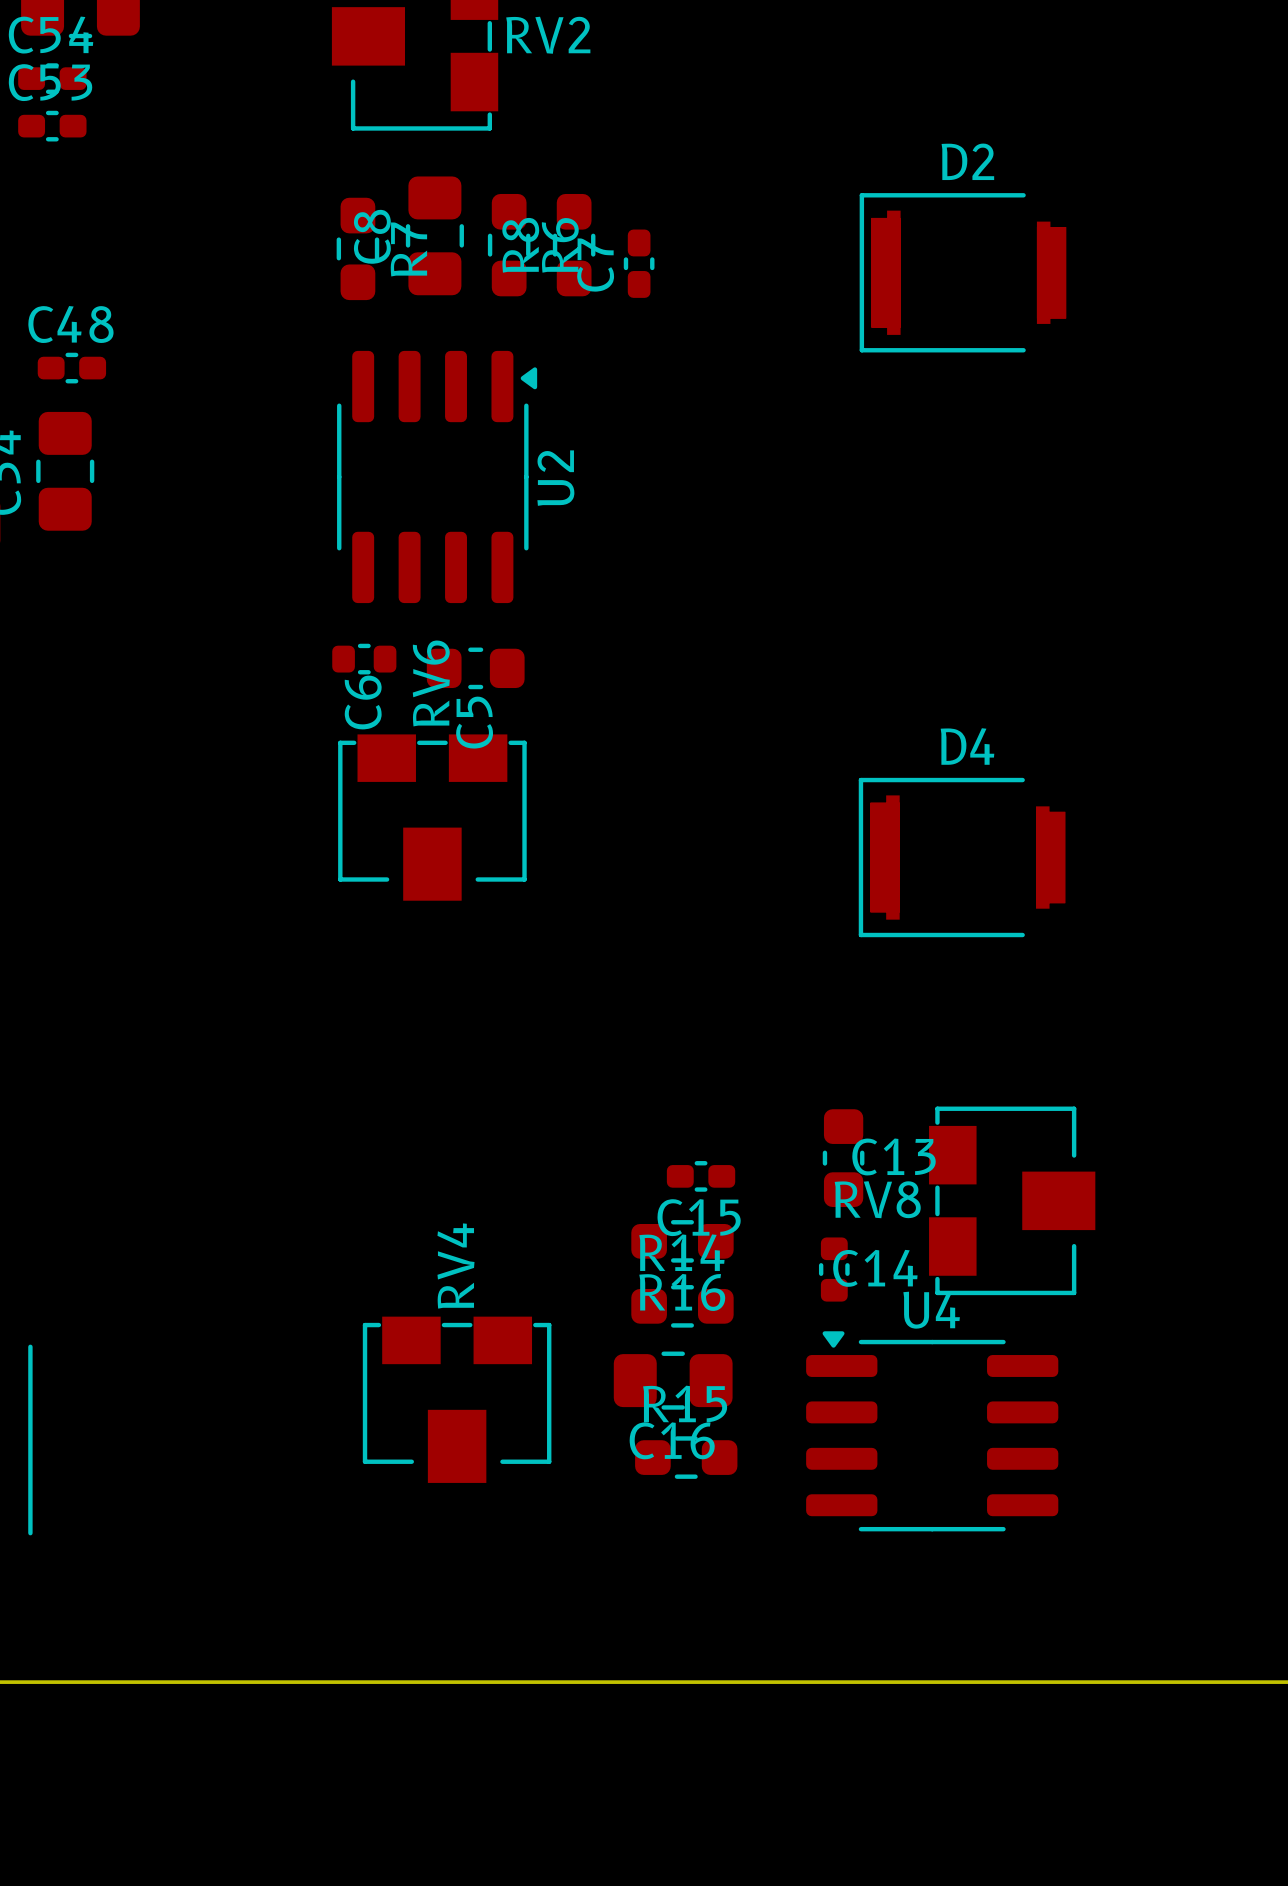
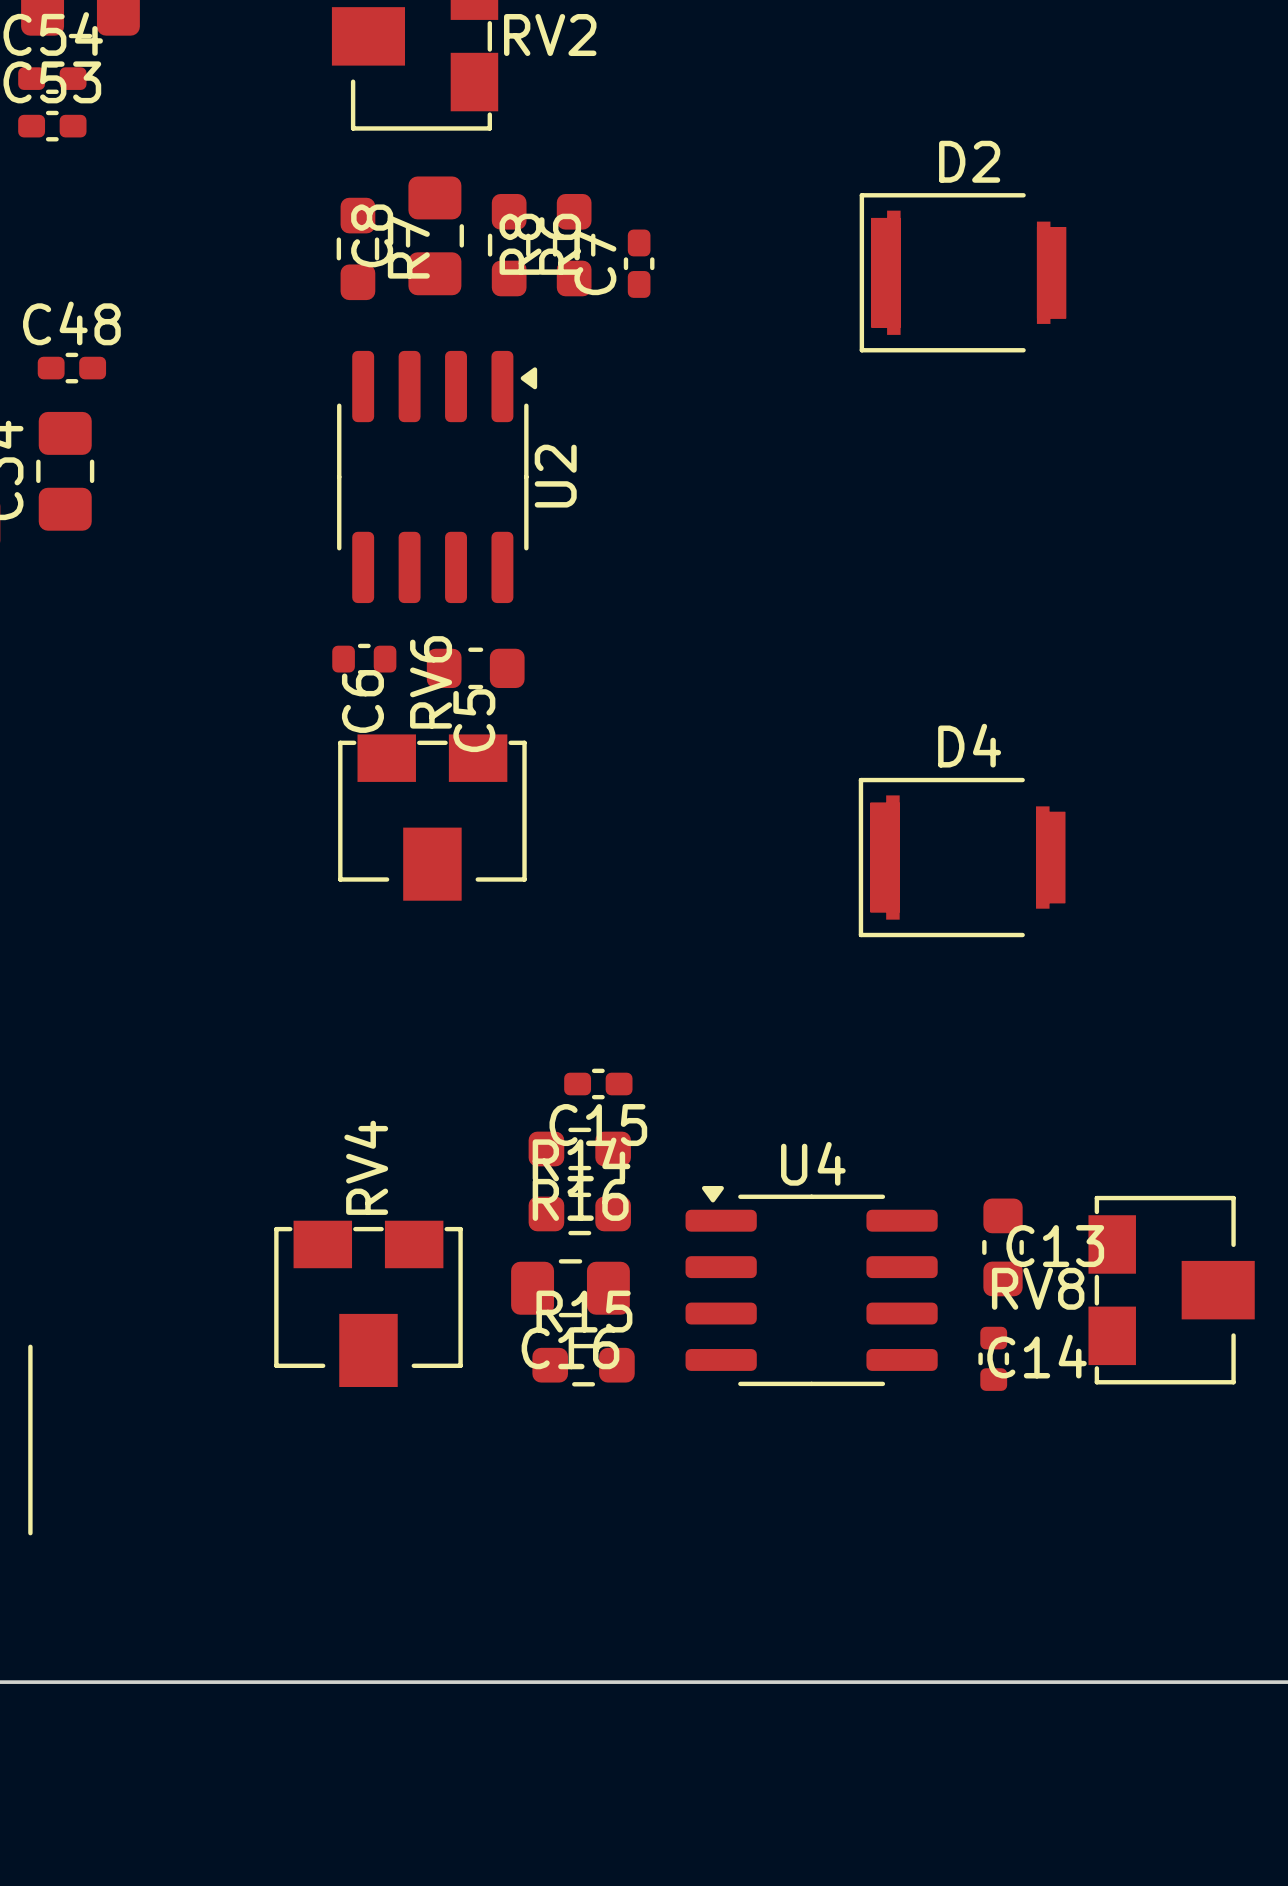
C13 position: (843, 1158) -> (1003, 1247)
C15 position: (701, 1176) -> (598, 1084)
RV8 position: (1012, 1200) -> (1171, 1290)
R16 position: (682, 1241) -> (579, 1148)
C14 position: (834, 1269) -> (993, 1358)
R14 position: (682, 1306) -> (579, 1213)
C16 position: (673, 1380) -> (570, 1288)
RV4 position: (457, 1399) -> (368, 1303)
U4 position: (932, 1431) -> (811, 1286)
R15 position: (686, 1457) -> (583, 1365)

